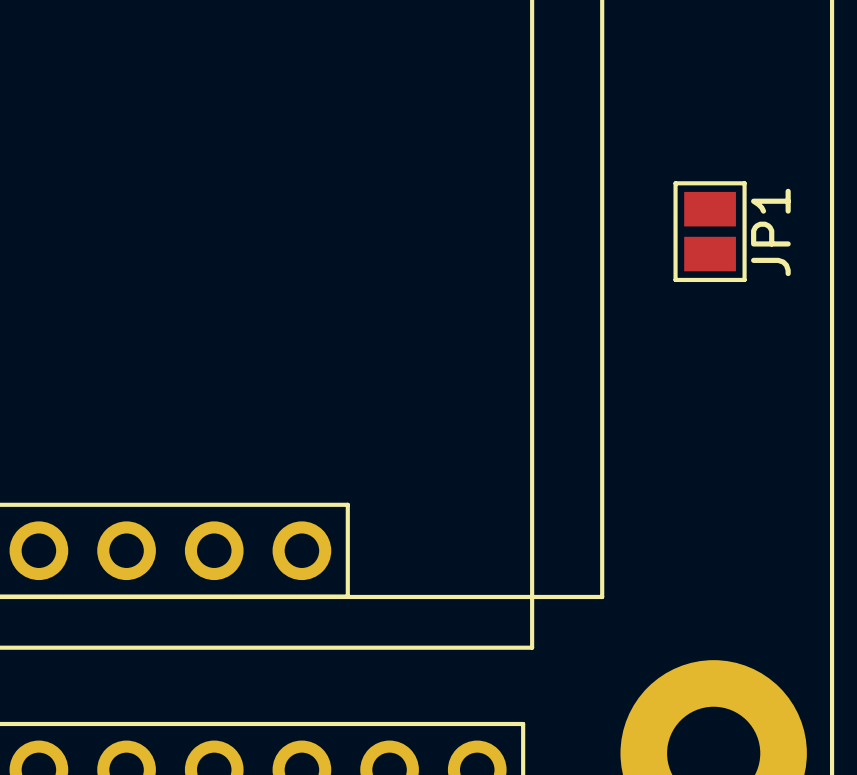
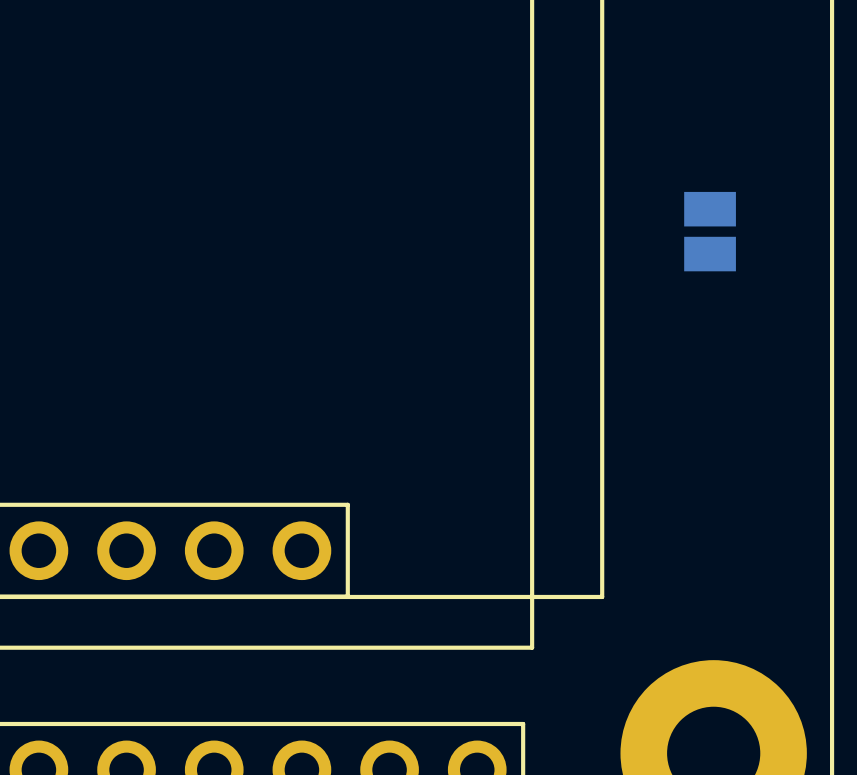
JP1 side: top (710, 231) -> bottom (710, 231)

